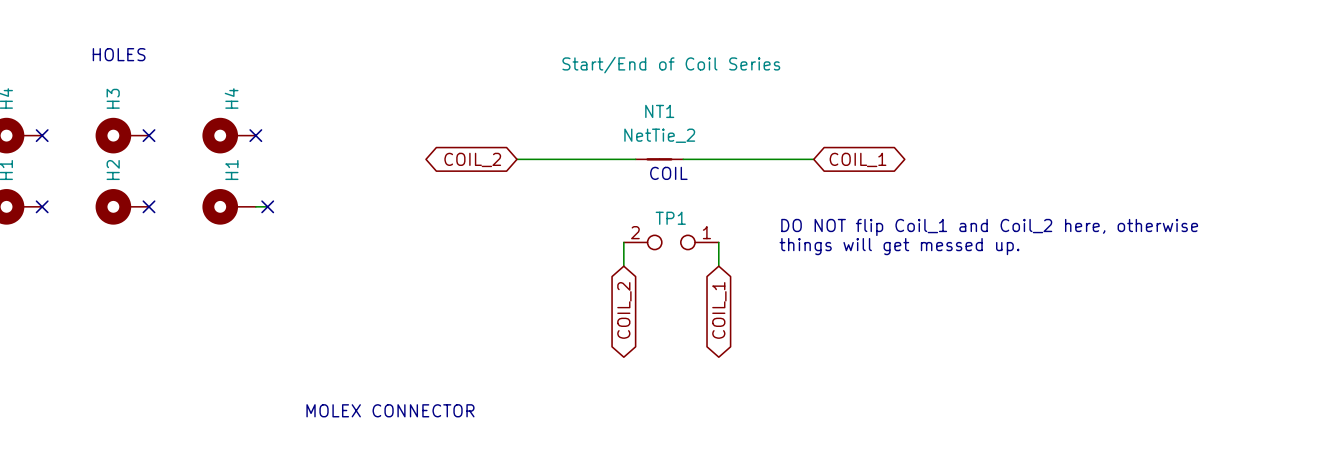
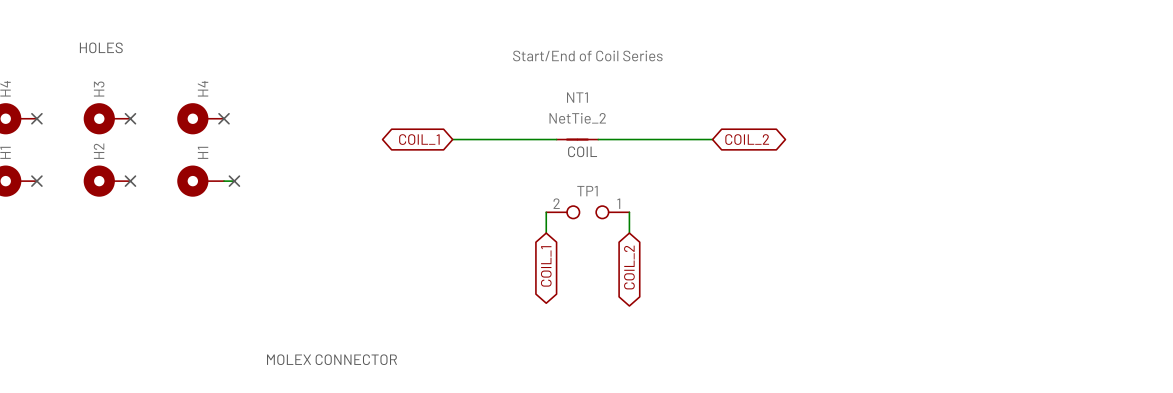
global label: COIL_2 (472, 159) -> COIL_1 (419, 139)
global label: COIL_1 (858, 159) -> COIL_2 (747, 139)
text: DO NOT flip Coil_1 and Coil_2 here, otherwise (989, 227) -> none
text: things will get messed up. (899, 246) -> none
global label: COIL_2 (624, 310) -> COIL_1 (546, 266)
global label: COIL_1 (719, 310) -> COIL_2 (629, 267)

